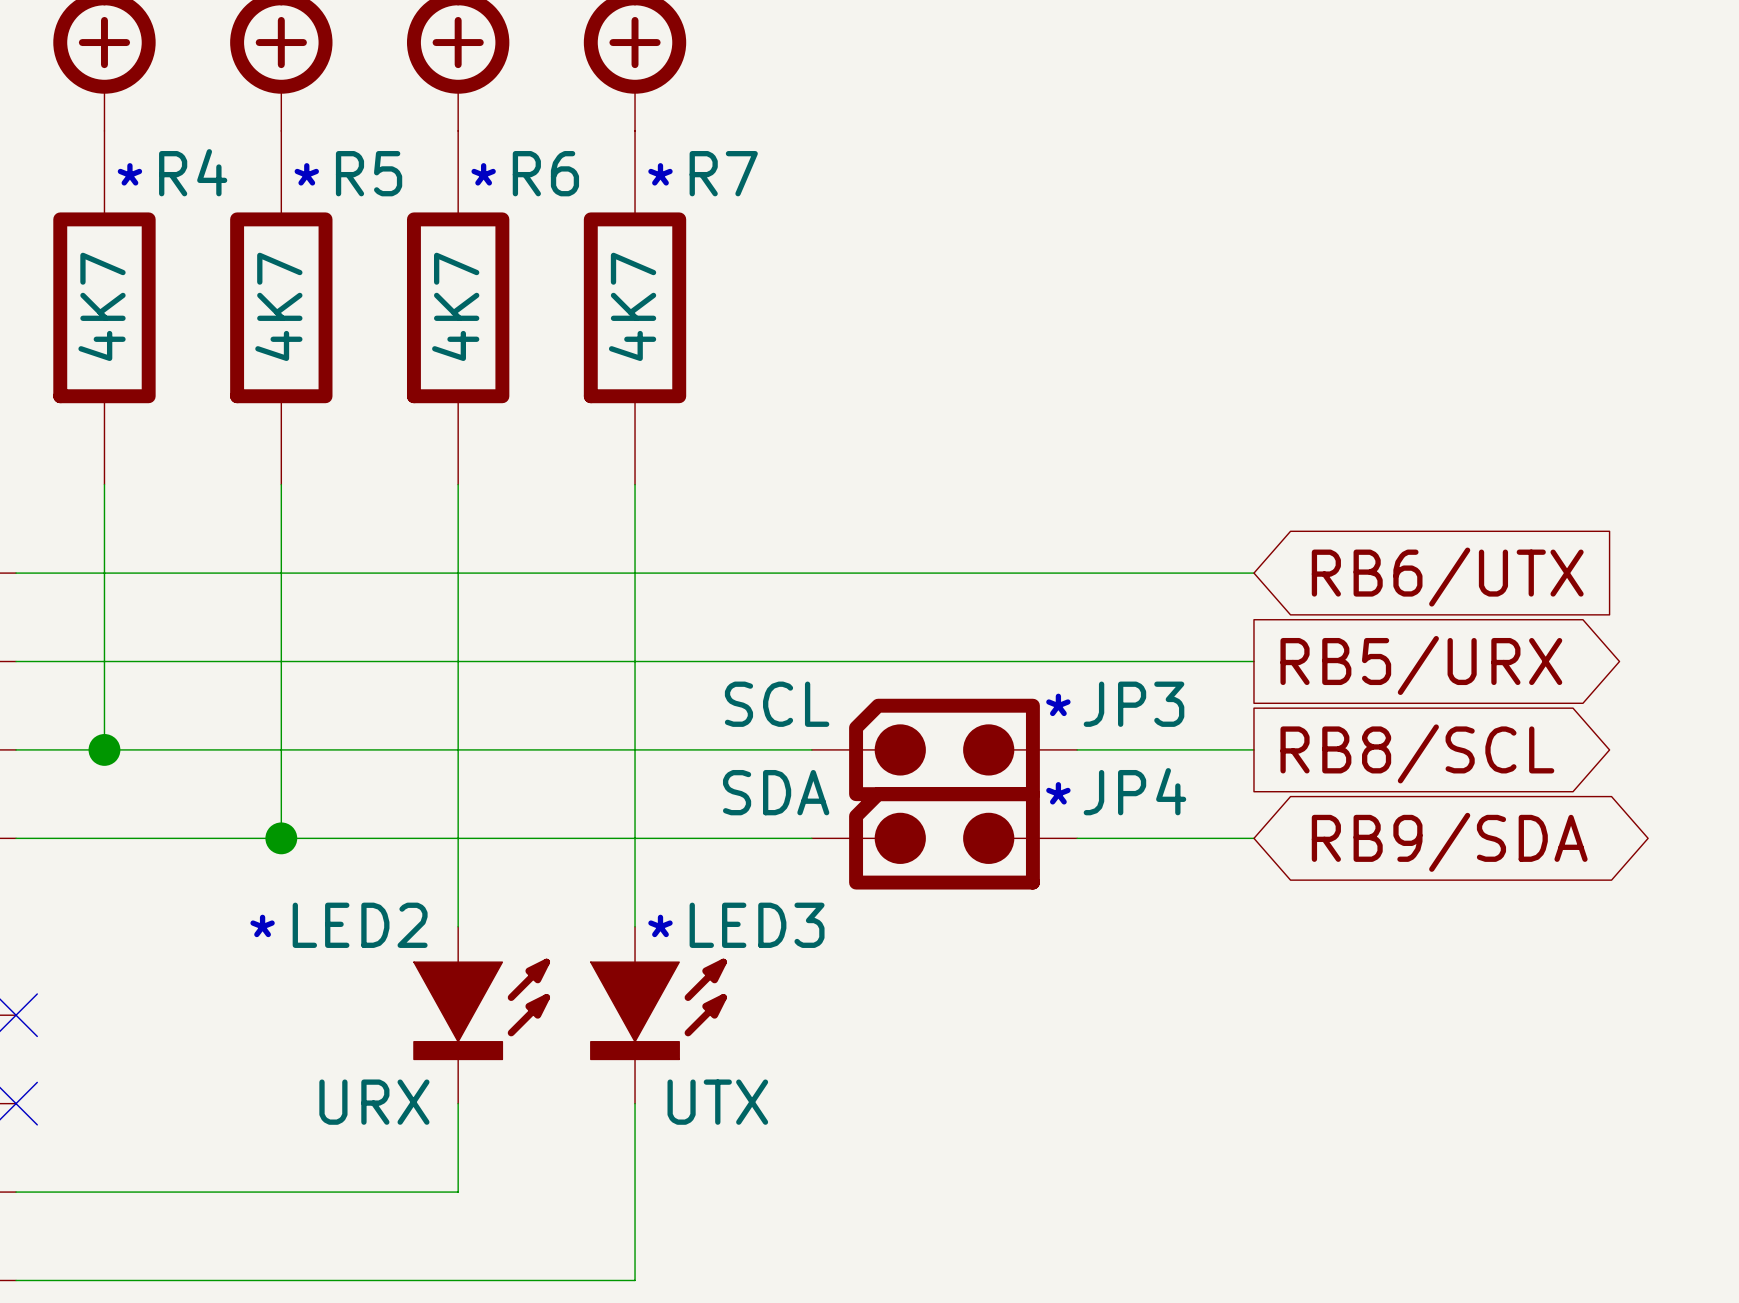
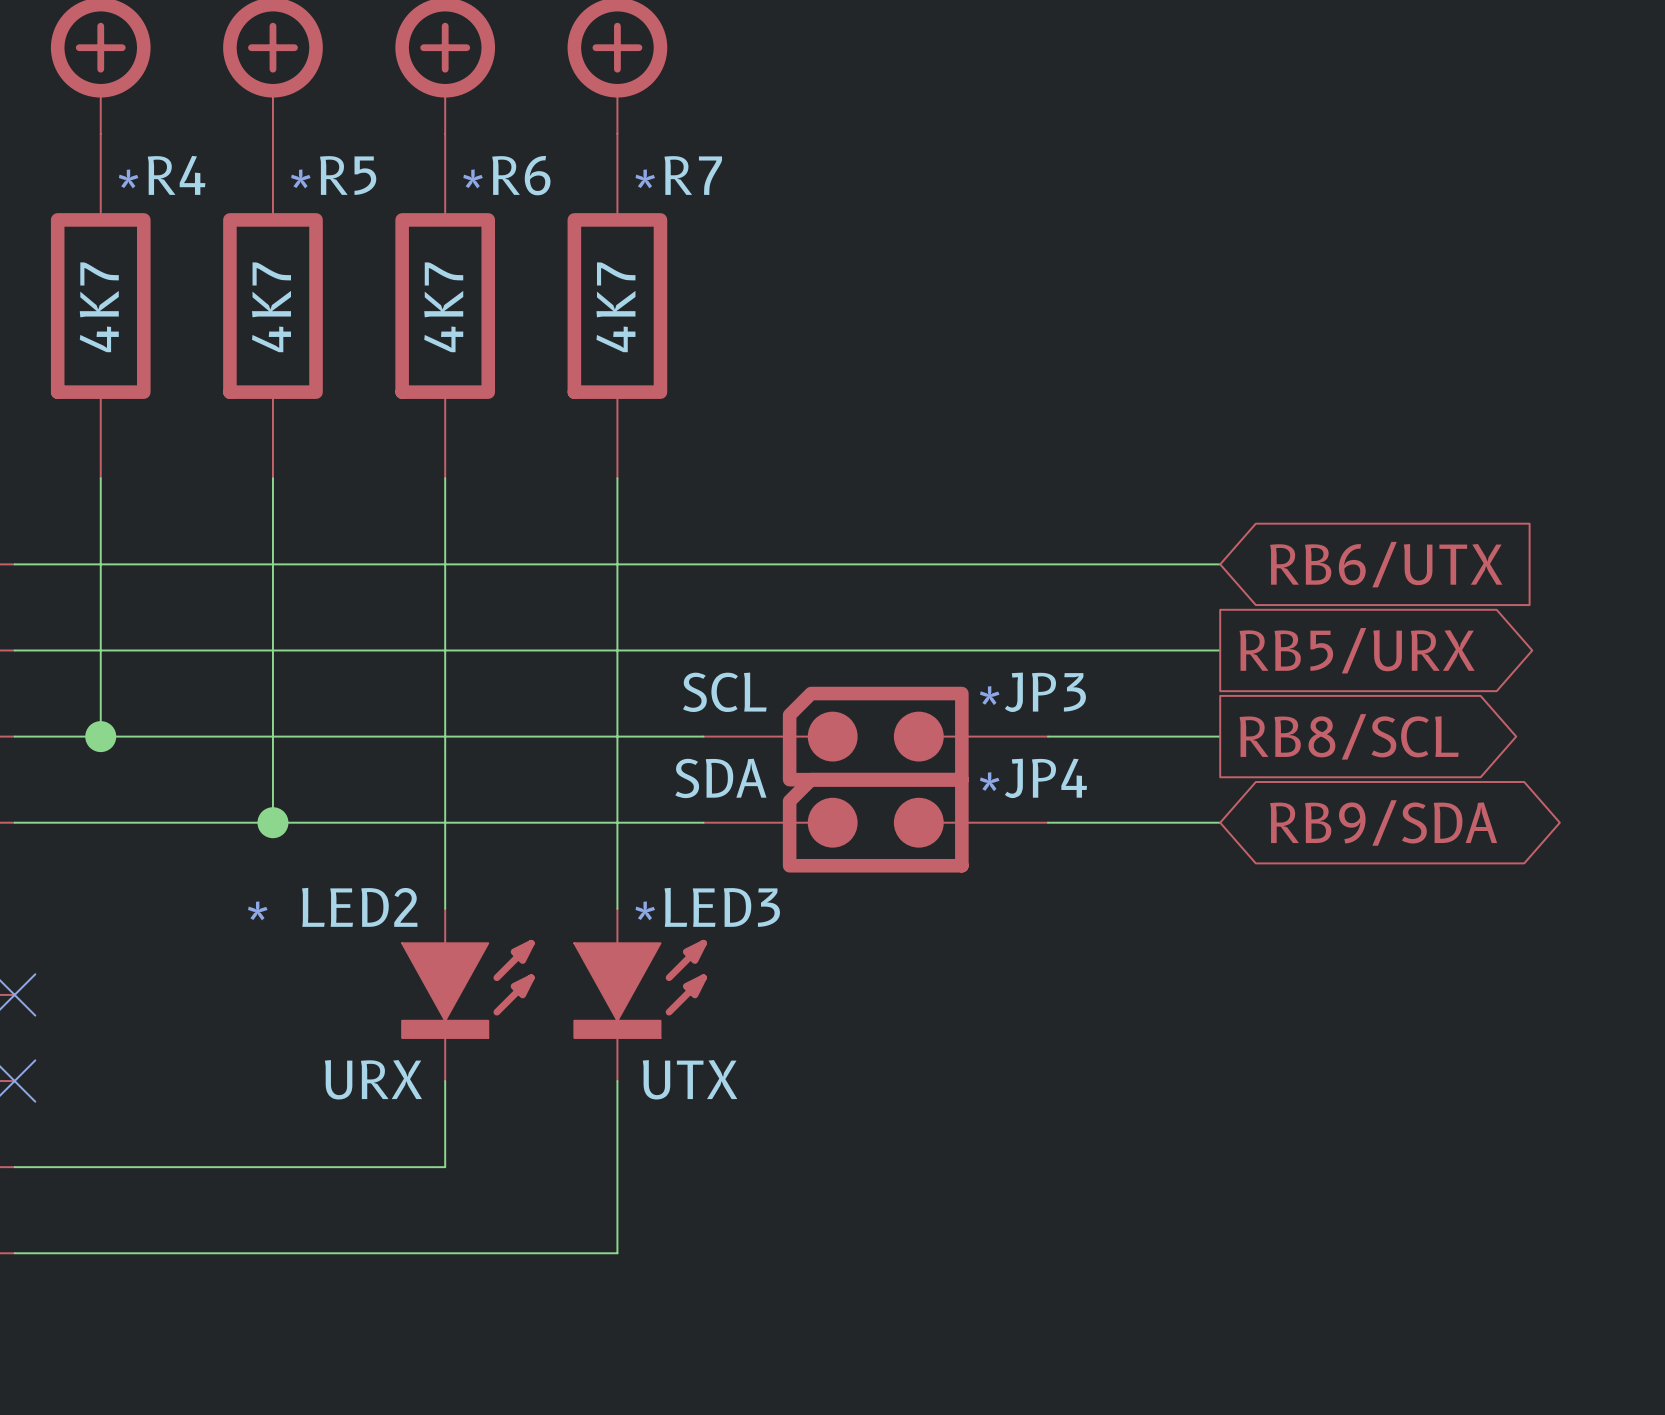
JP3 symbol: [811, 698, 1078, 802] -> [703, 686, 1048, 787]
text position: * (1058, 704) -> * (989, 695)
JP4 symbol: [811, 787, 1078, 890] -> [703, 772, 1048, 873]
text position: * (1058, 793) -> * (989, 781)

